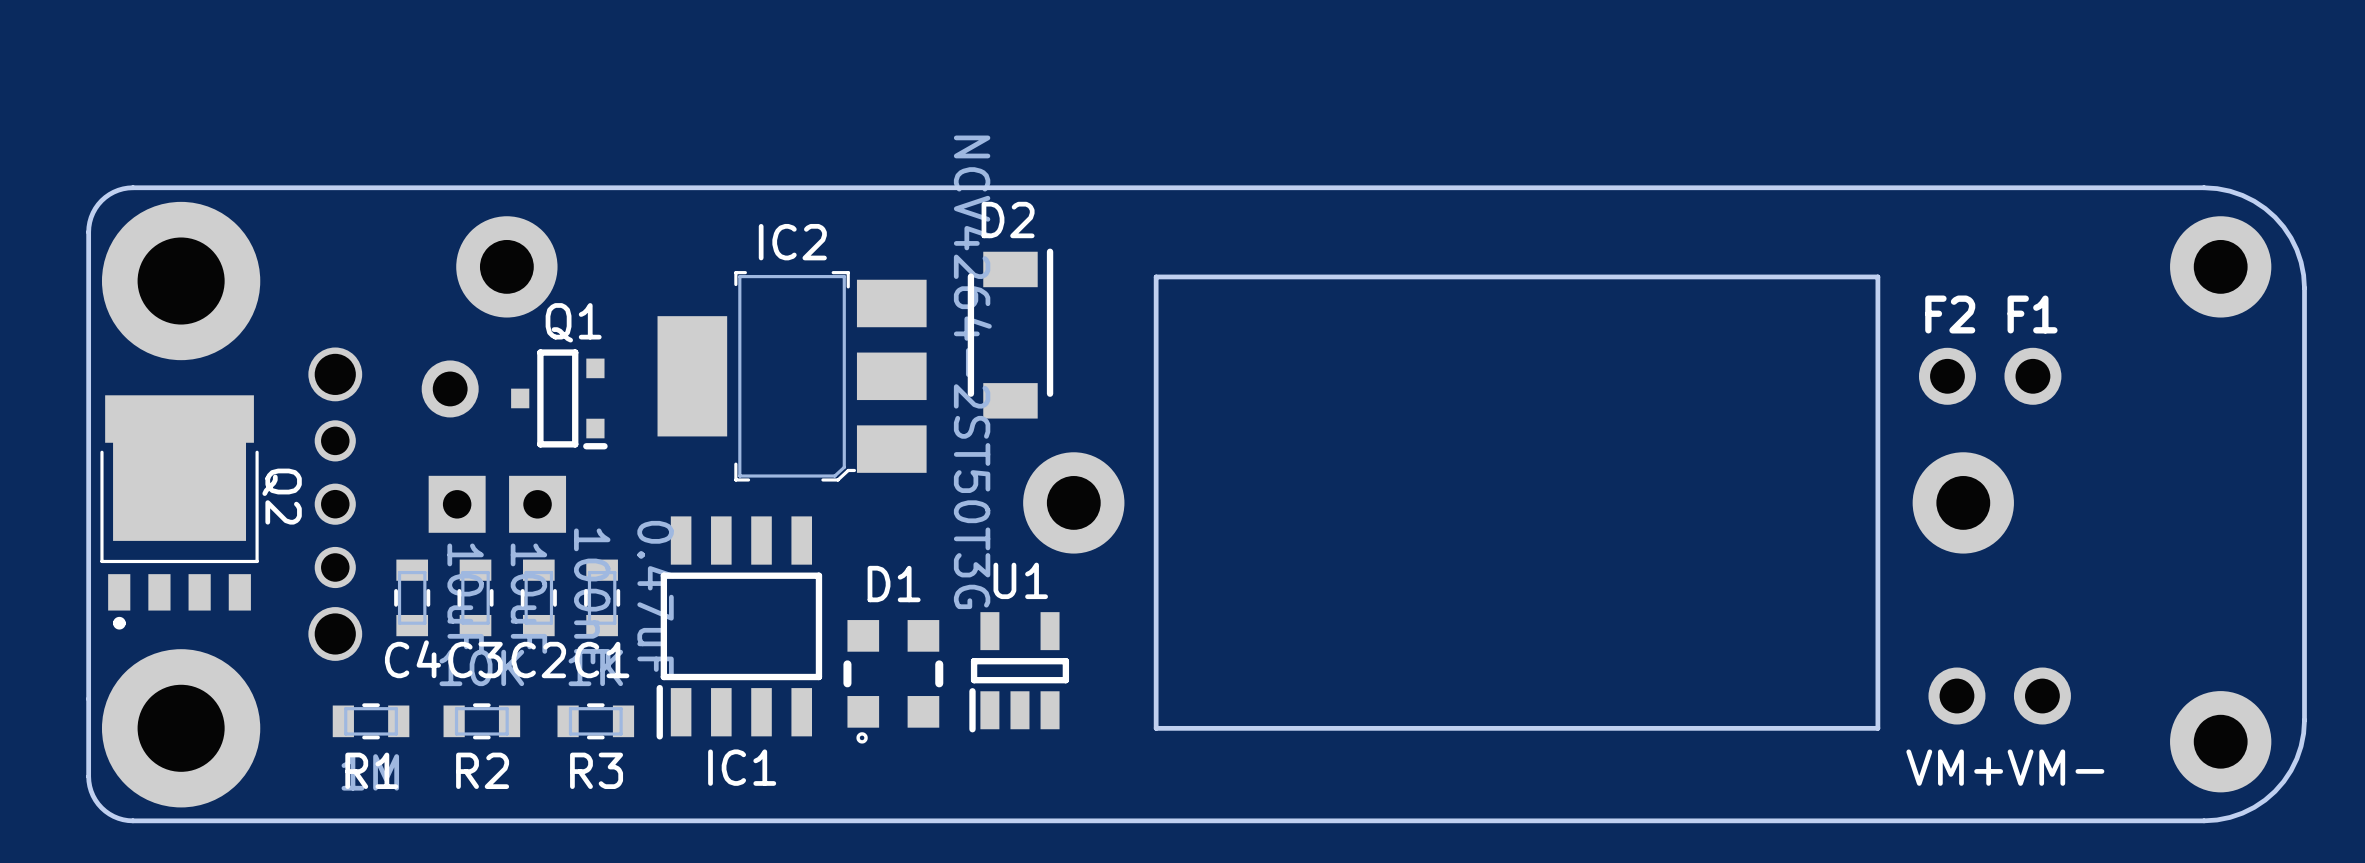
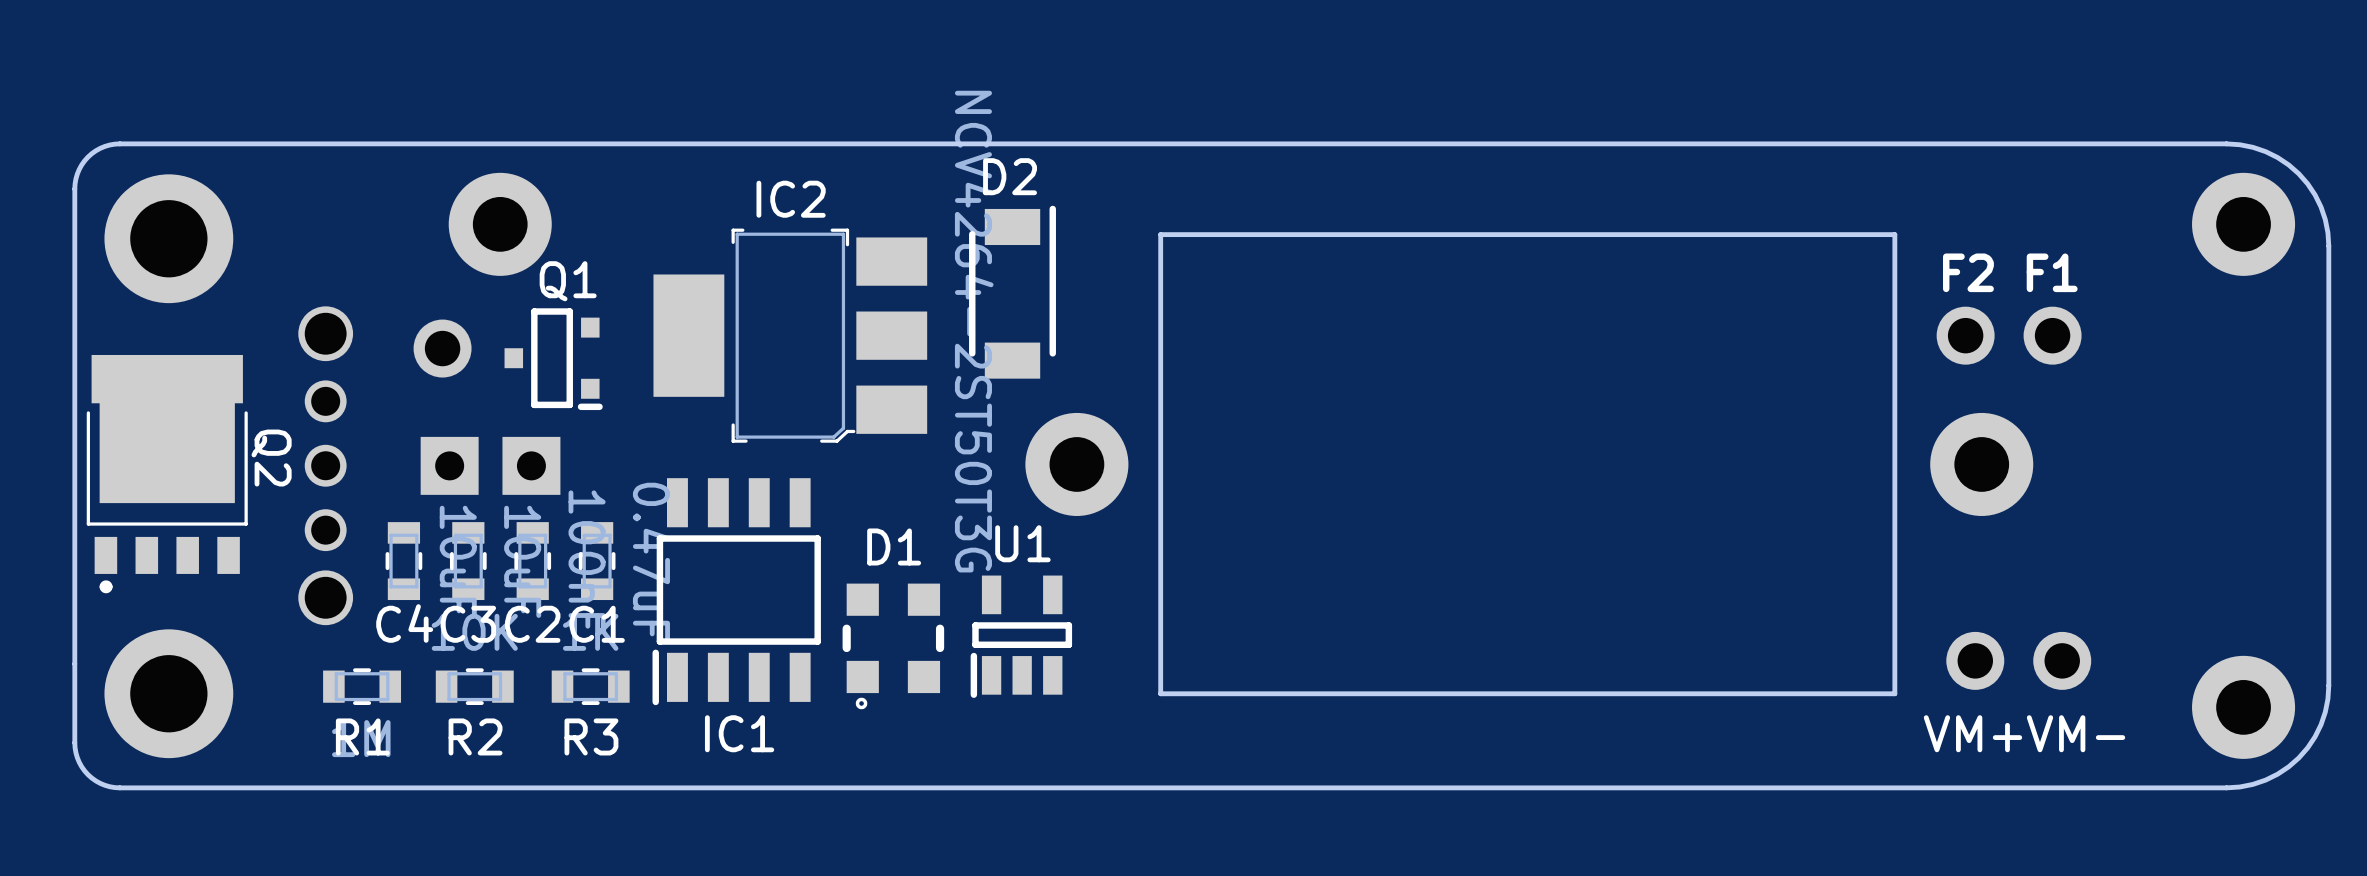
part footprint: [101, 201, 261, 361] -> [104, 174, 234, 304]
part footprint: [101, 649, 261, 808] -> [104, 629, 234, 759]

